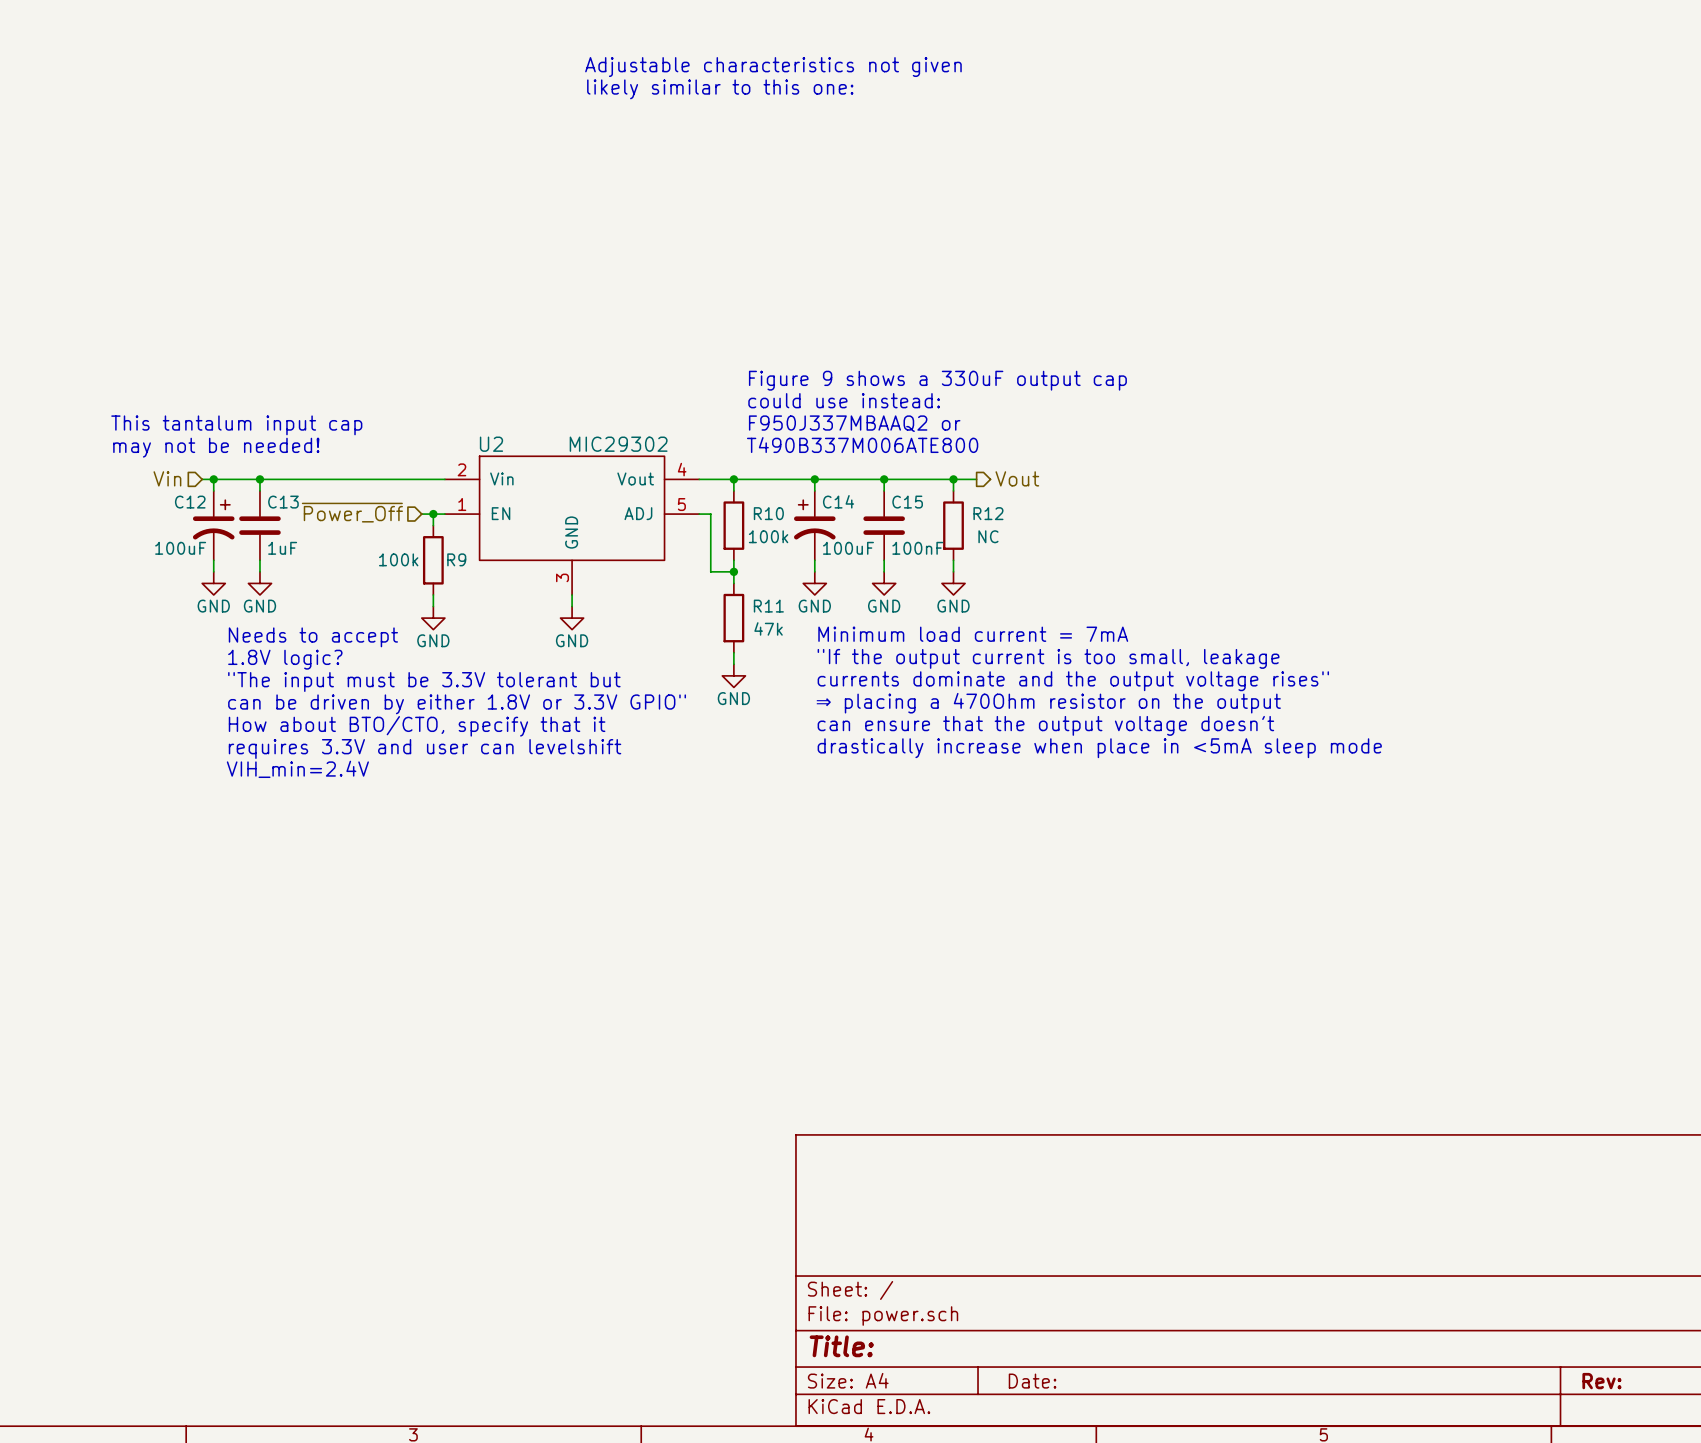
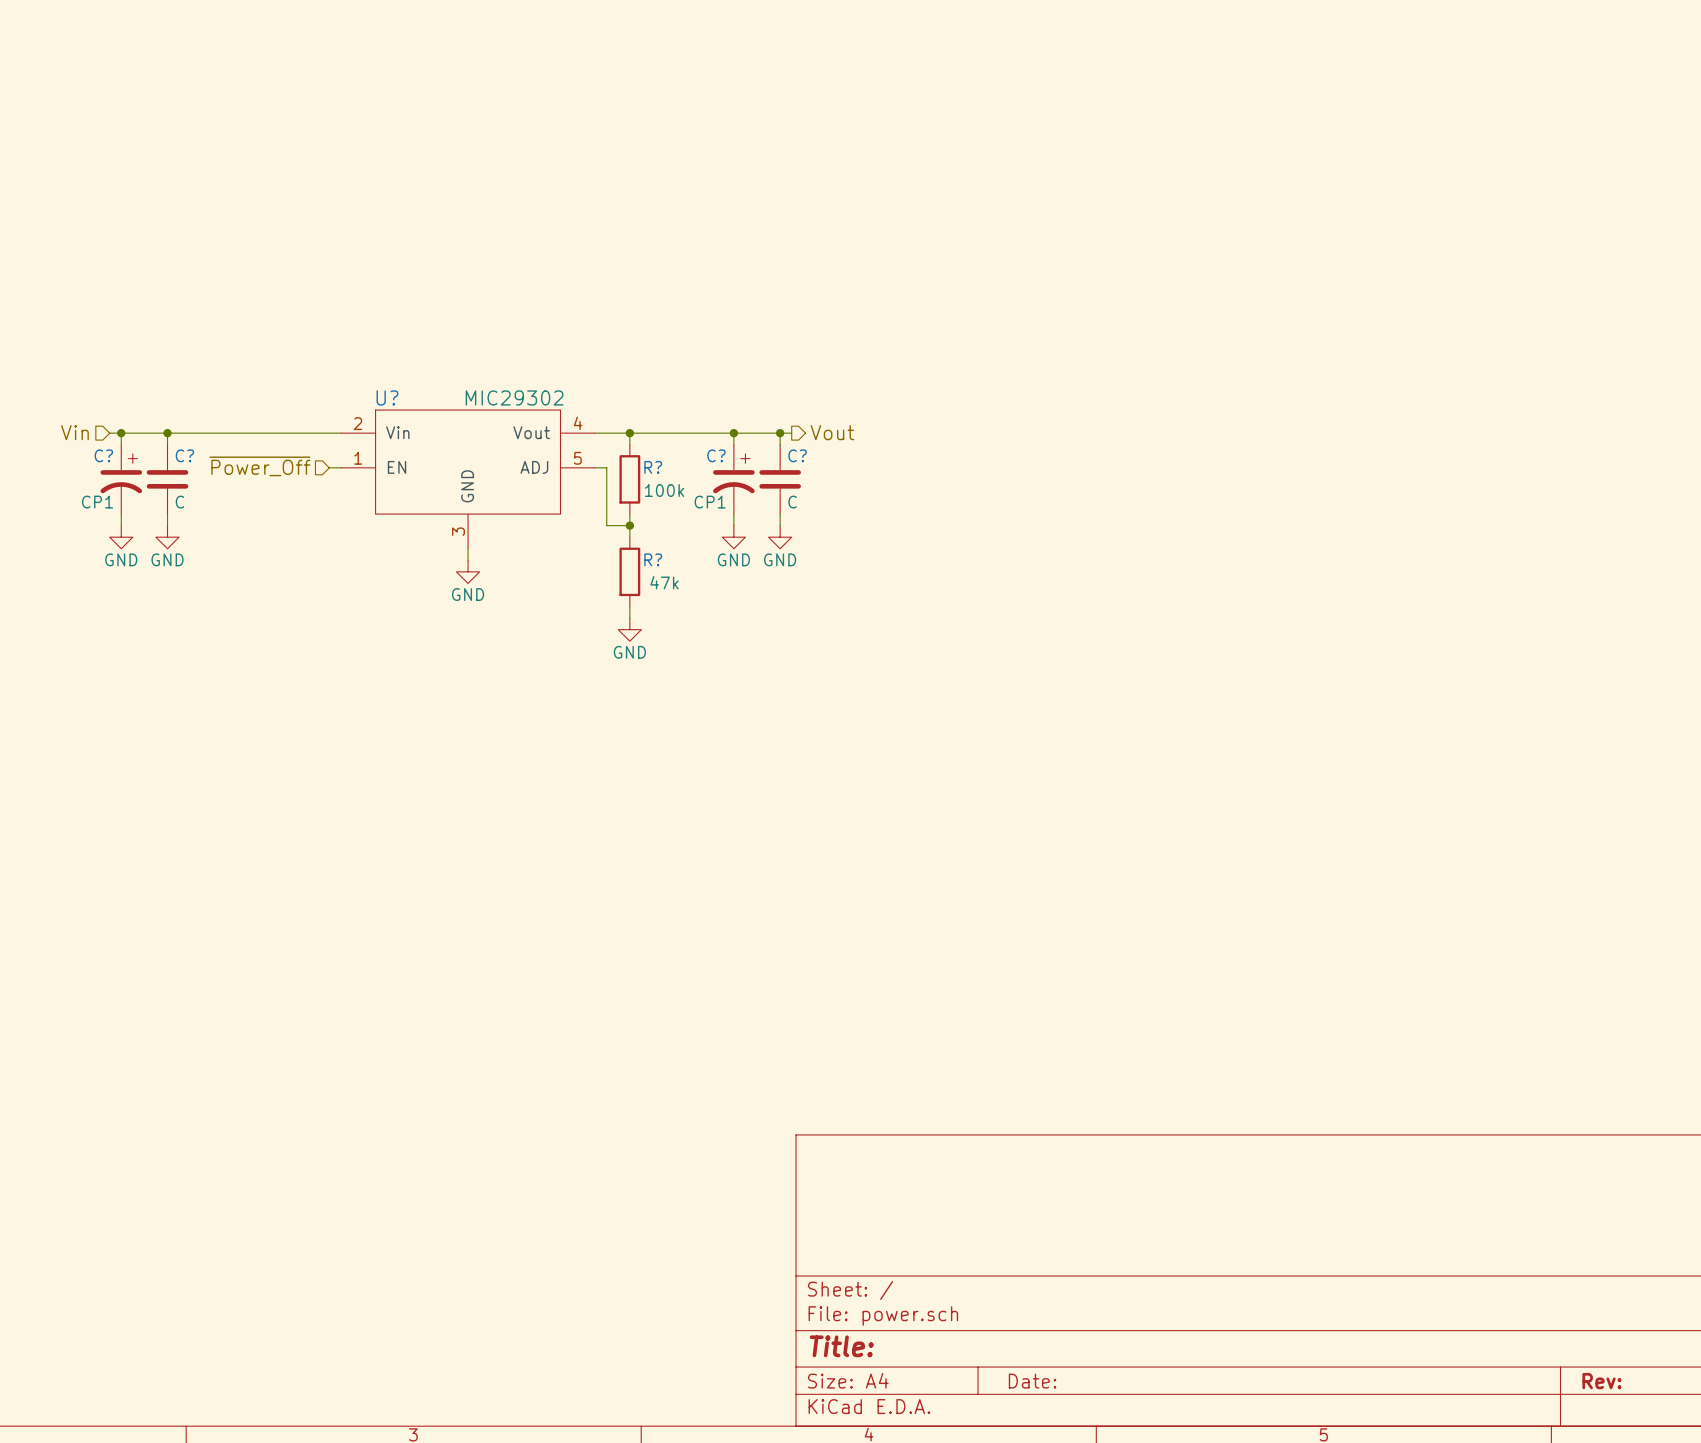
text: Adjustable characteristics not given (773, 67) -> none
text: likely similar to this one: (720, 89) -> none
text: Figure 9 shows a 330uF output cap (937, 380) -> none
text: could use instead: (844, 400) -> none
text: F950J337MBAAQ2 or (854, 423) -> none
text: This tantalum input cap (236, 425) -> none
wire: none -> (109, 433) (340, 433)
junction: none -> (121, 433)
junction: none -> (167, 433)
wire: none -> (595, 433) (791, 433)
junction: none -> (629, 433)
junction: none -> (733, 433)
junction: none -> (780, 433)
text: T490B337M006ATE800 (862, 445) -> none
text: may not be needed! (216, 447) -> none
wire: none -> (329, 467) (340, 467)
hierarchical label position: Vin (167, 478) -> Vin (74, 432)
hierarchical label position: Vout (1017, 478) -> Vout (832, 432)
C?: none -> CP1 (121, 479)
C?: none -> C (167, 479)
wire: (202, 479) (444, 479) -> none
wire: (213, 479) (213, 490) -> (121, 433) (121, 444)
junction: (213, 479) -> none
wire: (259, 479) (259, 490) -> (167, 433) (167, 444)
junction: (259, 479) -> none
U?: none -> MIC29302 (468, 479)
R?: none -> 100k (629, 479)
wire: (699, 479) (976, 479) -> none
C?: none -> CP1 (733, 479)
junction: (733, 479) -> none
C?: none -> C (780, 479)
wire: (814, 479) (814, 490) -> (733, 433) (733, 444)
junction: (814, 479) -> none
wire: (884, 479) (884, 490) -> (780, 433) (780, 444)
junction: (884, 479) -> none
wire: (953, 479) (953, 490) -> none
junction: (953, 479) -> none
hierarchical label position: ~{Power_Off} (352, 512) -> ~{Power_Off} (259, 466)
wire: (433, 514) (433, 525) -> none
junction: (433, 514) -> none
wire: (699, 514) (710, 514) (710, 571) (733, 571) -> (595, 467) (606, 467) (606, 525) (629, 525)
C12: 100uF (213, 525) -> none
C13: 1uF (259, 525) -> none
U2: MIC29302 (572, 525) -> none
junction: none -> (629, 525)
R10: 100k (733, 525) -> none
C14: 100uF (814, 525) -> none
C15: 100nF (884, 525) -> none
R12: NC (953, 525) -> none
power symbol: none -> GND (121, 537)
power symbol: none -> GND (167, 537)
power symbol: none -> GND (733, 537)
power symbol: none -> GND (780, 537)
wire: (213, 560) (213, 571) -> (121, 514) (121, 525)
wire: (259, 560) (259, 571) -> (167, 514) (167, 525)
R9: 100k (433, 560) -> none
wire: (733, 560) (733, 583) -> (629, 514) (629, 537)
wire: (814, 560) (814, 571) -> (733, 514) (733, 525)
wire: (884, 560) (884, 571) -> (780, 514) (780, 525)
wire: (953, 560) (953, 571) -> none
power symbol: none -> GND (468, 571)
R?: none -> 47k (629, 571)
junction: (733, 571) -> none
power symbol: GND (213, 583) -> none
power symbol: GND (259, 583) -> none
power symbol: GND (814, 583) -> none
power symbol: GND (884, 583) -> none
power symbol: GND (953, 583) -> none
wire: (433, 594) (433, 606) -> none
wire: (572, 594) (572, 606) -> (468, 548) (468, 560)
power symbol: GND (433, 618) -> none
power symbol: GND (572, 618) -> none
R11: 47k (733, 618) -> none
power symbol: none -> GND (629, 629)
text: Minimum load current = 7mA (973, 634) -> none
text: Needs to accept (313, 637) -> none
wire: (733, 652) (733, 664) -> (629, 606) (629, 618)
text: "If the output current is too small, leakage (1048, 658) -> none
text: 1.8V logic? (285, 659) -> none
power symbol: GND (733, 675) -> none
text: currents dominate and the output voltage rises" (1073, 681) -> none
text: "The input must be 3.3V tolerant but (424, 682) -> none
text: ⇒ placing a 470Ohm resistor on the output (1048, 703) -> none
text: can be driven by either 1.8V or 3.3V GPIO" (457, 704) -> none
text: can ensure that the output voltage doesn't (1045, 725) -> none
text: How about BTO/CTO, specify that it (417, 726) -> none
text: requires 3.3V and user can levelshift (425, 748) -> none
text: drastically increase when place in <5mA sleep mode (1099, 748) -> none
text: VIH_min=2.4V (297, 769) -> none

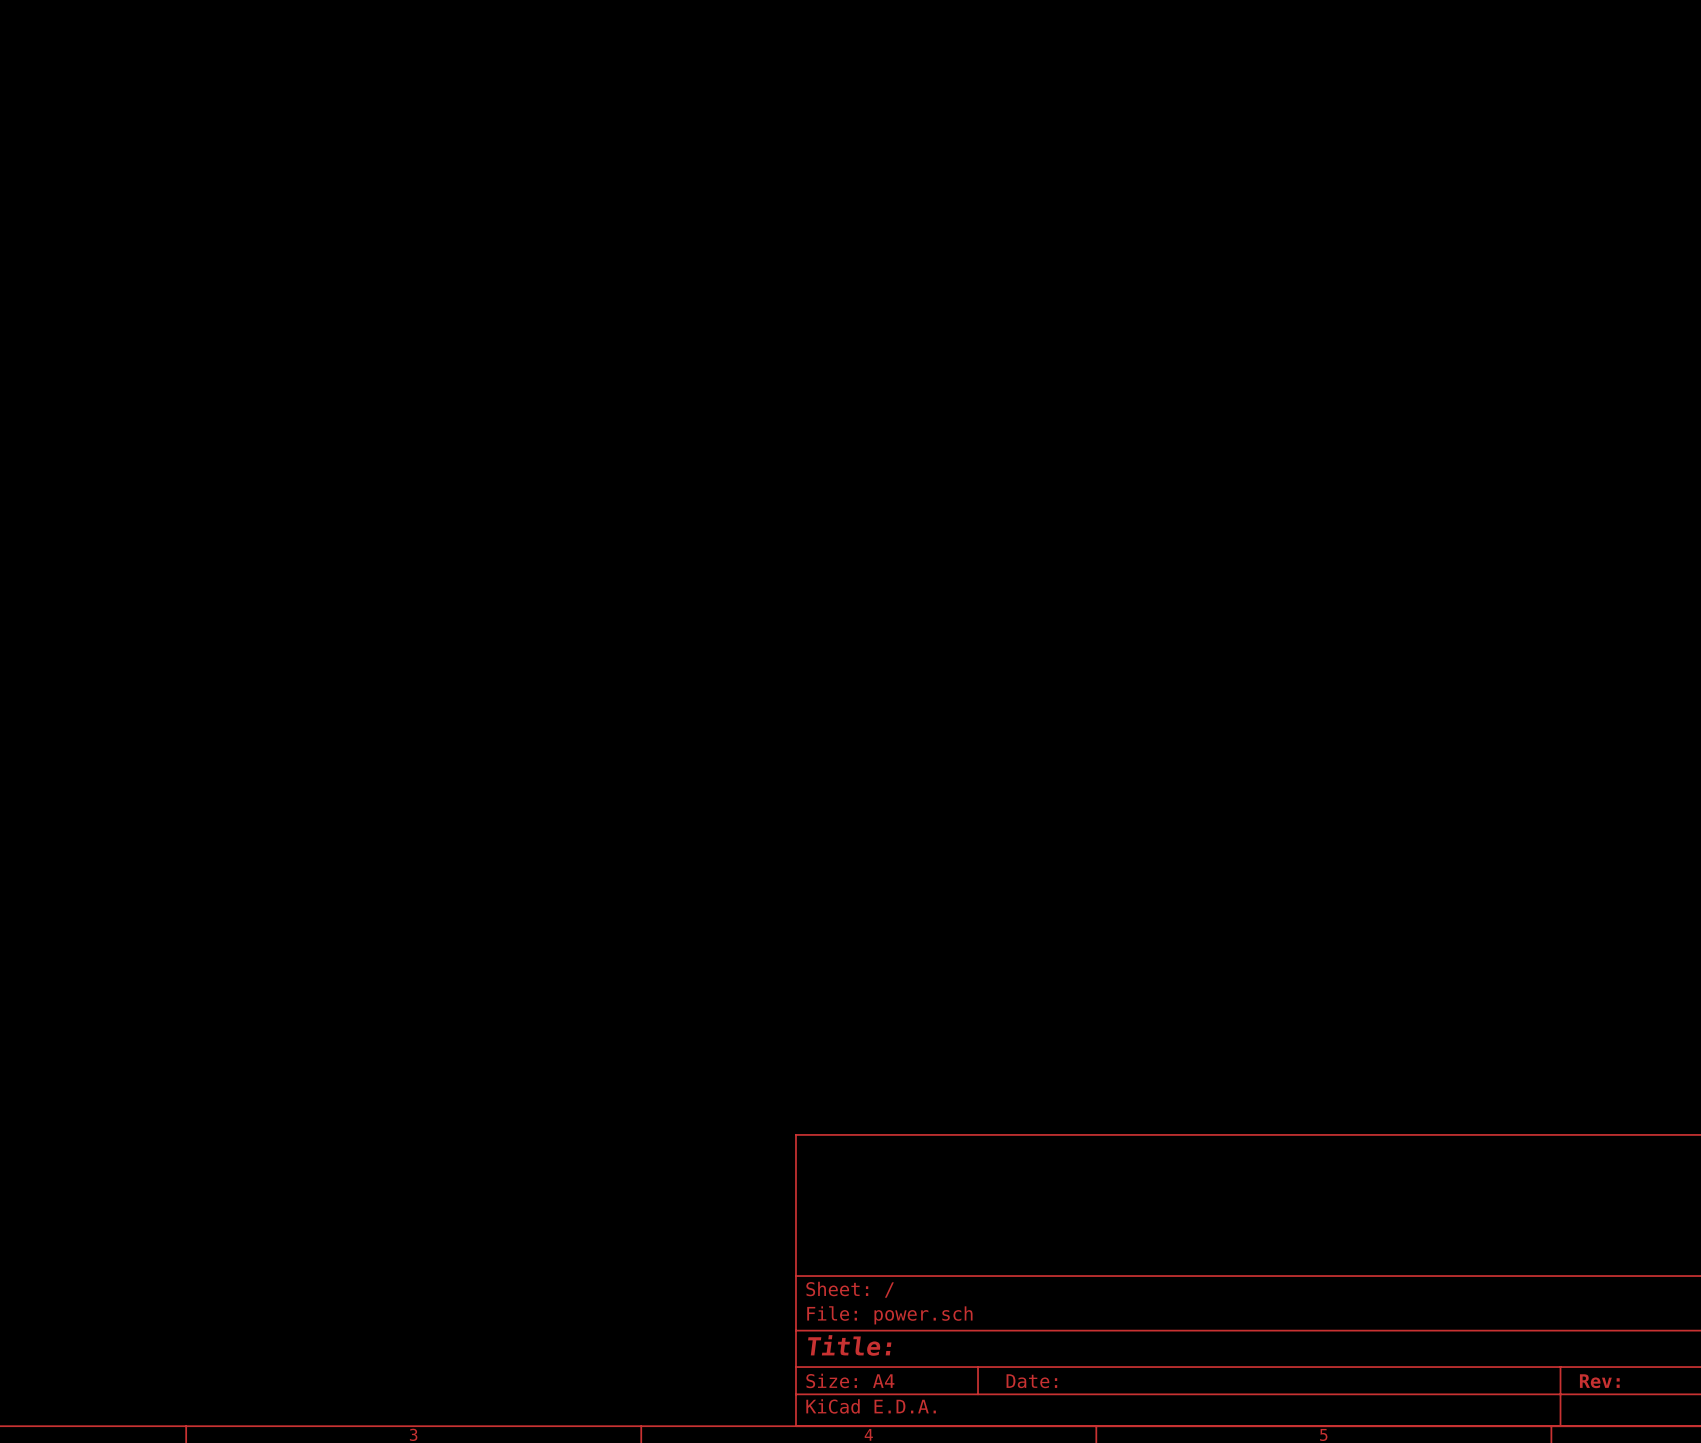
hierarchical label: Vin (74, 432) -> none
hierarchical label: Vout (832, 432) -> none
wire: (109, 433) (340, 433) -> none
wire: (121, 433) (121, 444) -> none
junction: (121, 433) -> none
wire: (167, 433) (167, 444) -> none
junction: (167, 433) -> none
wire: (595, 433) (791, 433) -> none
wire: (629, 433) (629, 444) -> none
junction: (629, 433) -> none
wire: (733, 433) (733, 444) -> none
junction: (733, 433) -> none
wire: (780, 433) (780, 444) -> none
junction: (780, 433) -> none
hierarchical label: ~{Power_Off} (259, 466) -> none
wire: (329, 467) (340, 467) -> none
wire: (595, 467) (606, 467) (606, 525) (629, 525) -> none
C?: CP1 (121, 479) -> none
C?: C (167, 479) -> none
U?: MIC29302 (468, 479) -> none
R?: 100k (629, 479) -> none
C?: CP1 (733, 479) -> none
C?: C (780, 479) -> none
wire: (121, 514) (121, 525) -> none
wire: (167, 514) (167, 525) -> none
wire: (629, 514) (629, 537) -> none
wire: (733, 514) (733, 525) -> none
wire: (780, 514) (780, 525) -> none
junction: (629, 525) -> none
power symbol: GND (121, 537) -> none
power symbol: GND (167, 537) -> none
power symbol: GND (733, 537) -> none
power symbol: GND (780, 537) -> none
wire: (468, 548) (468, 560) -> none
power symbol: GND (468, 571) -> none
R?: 47k (629, 571) -> none
wire: (629, 606) (629, 618) -> none
power symbol: GND (629, 629) -> none

